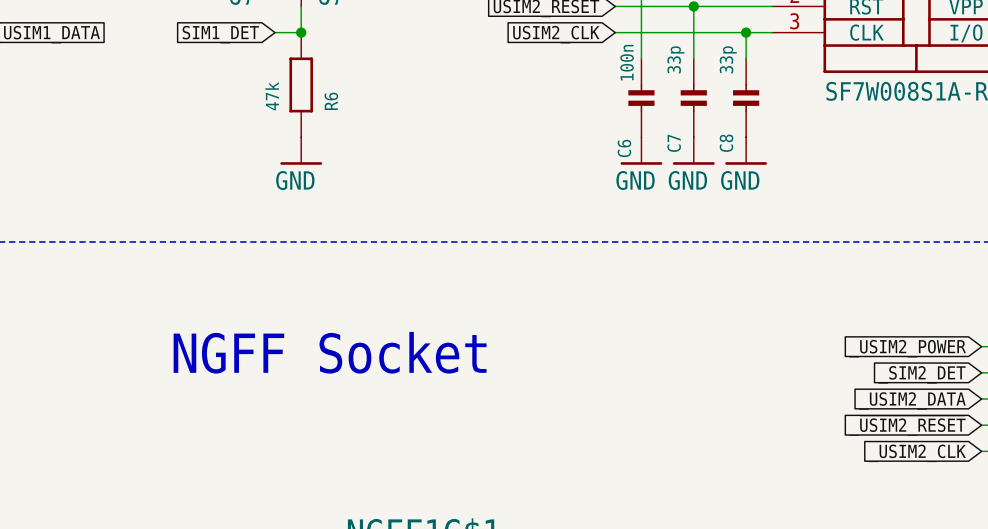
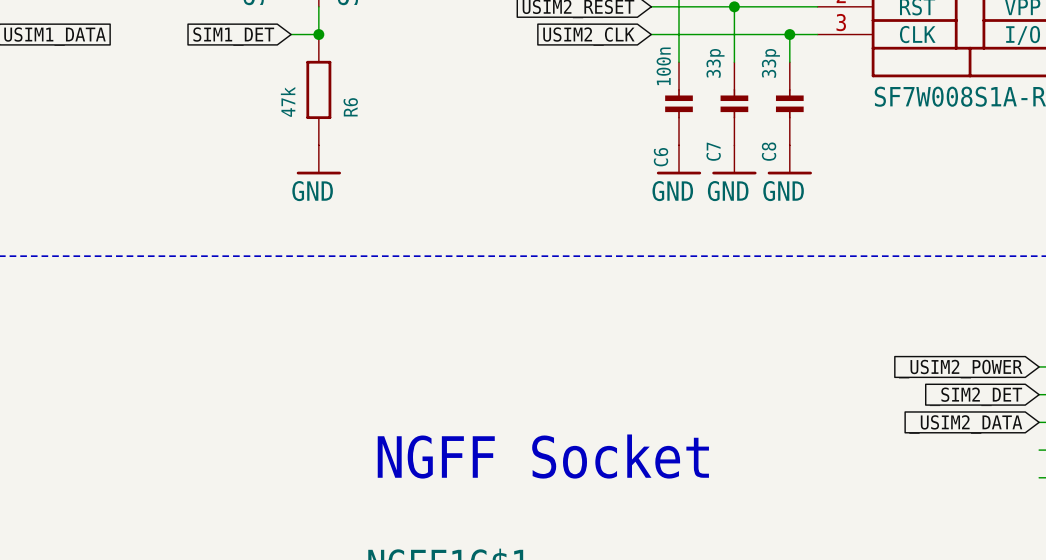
text position: NGFF Socket (330, 352) -> NGFF Socket (543, 456)
global label: _~{USIM2_RESET} (907, 425) -> none
global label: _USIM2_CLK (917, 453) -> none

